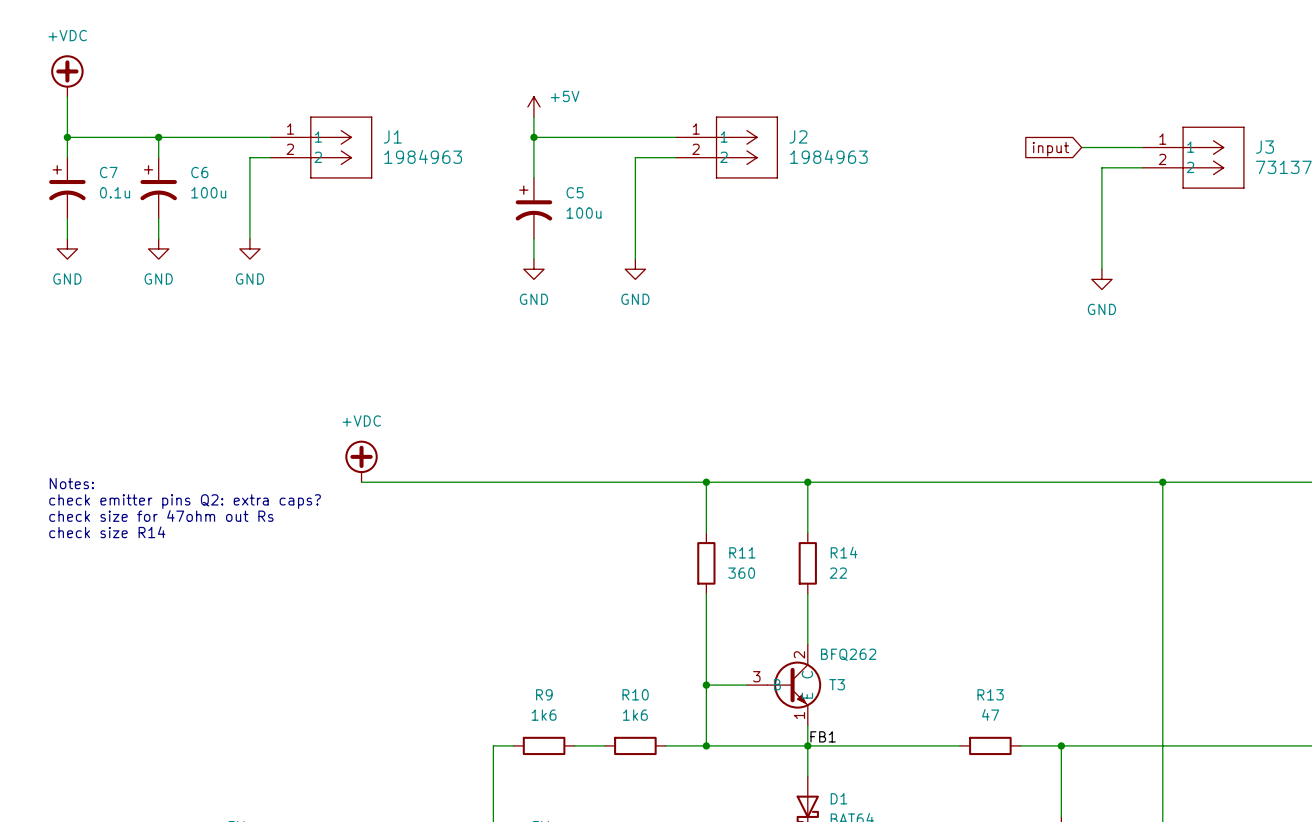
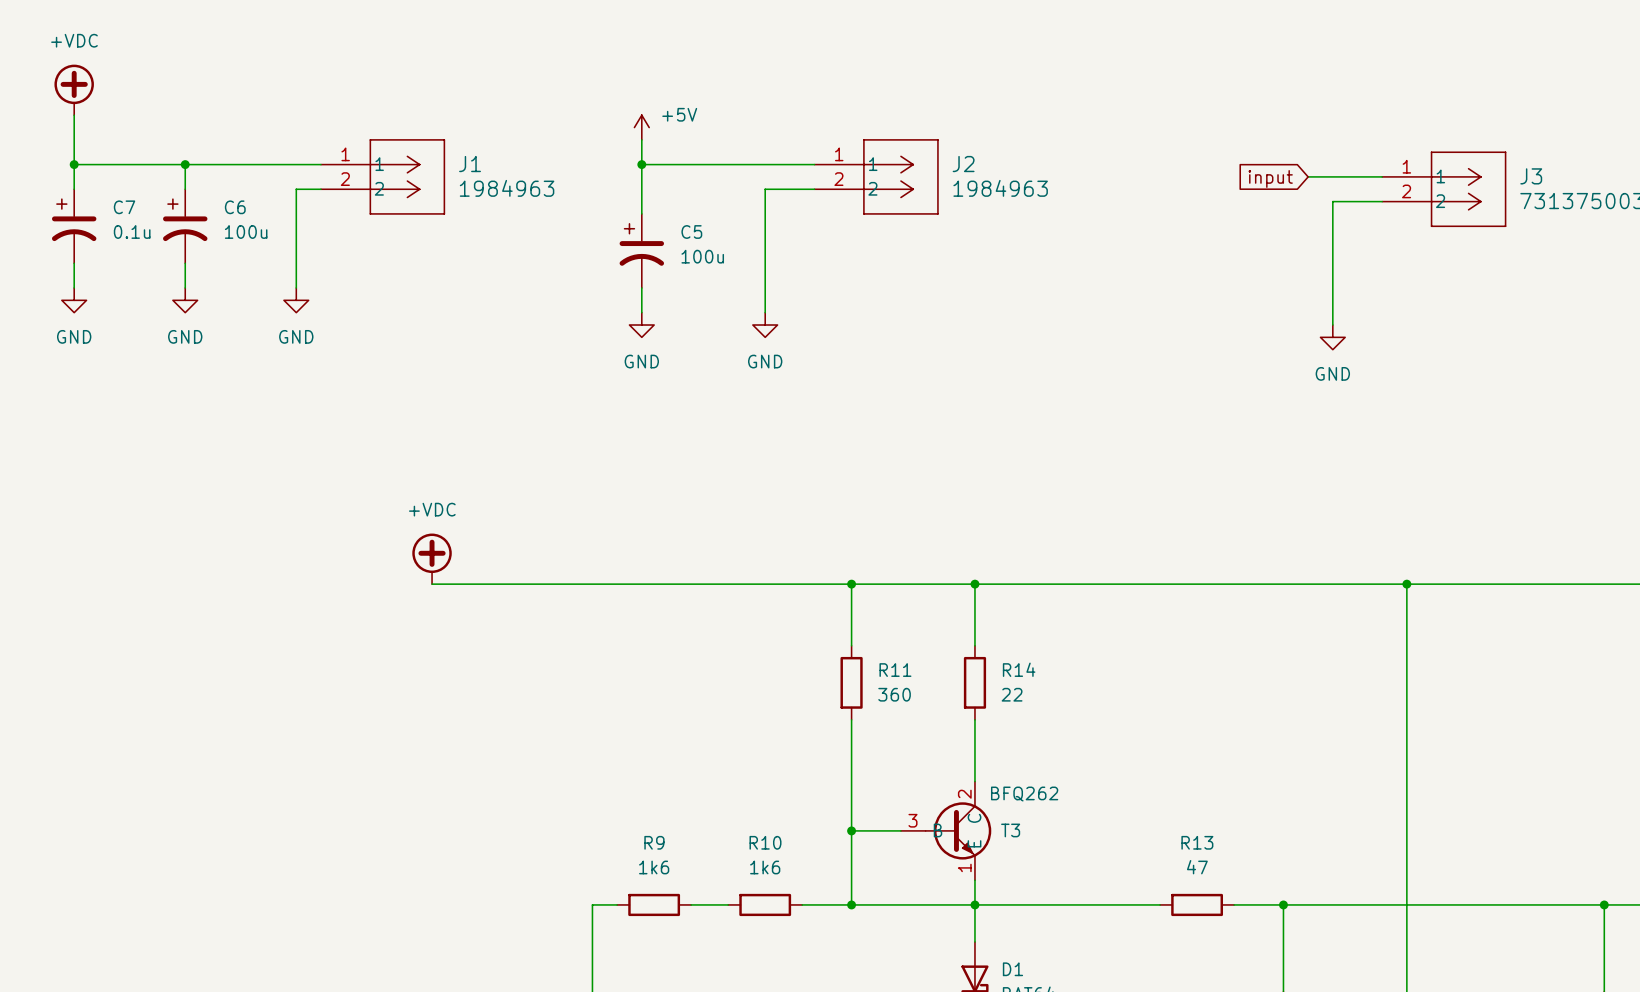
text: Notes: (71, 483) -> none
text: check emitter pins Q2: extra caps? (185, 501) -> none
text: check size for 47ohm out Rs (161, 515) -> none
text: check size R14 (107, 532) -> none
label: FB1 (823, 736) -> none

